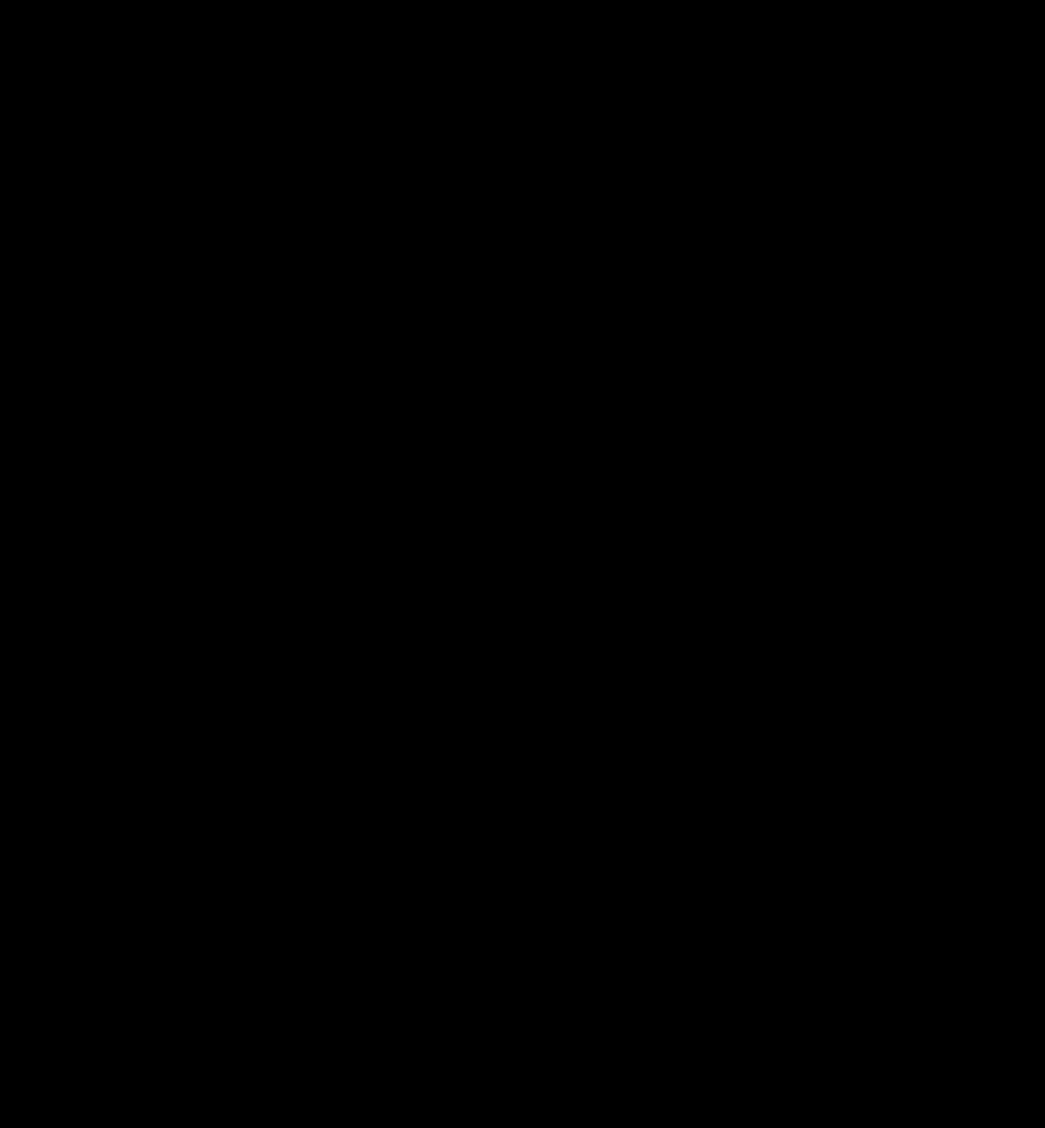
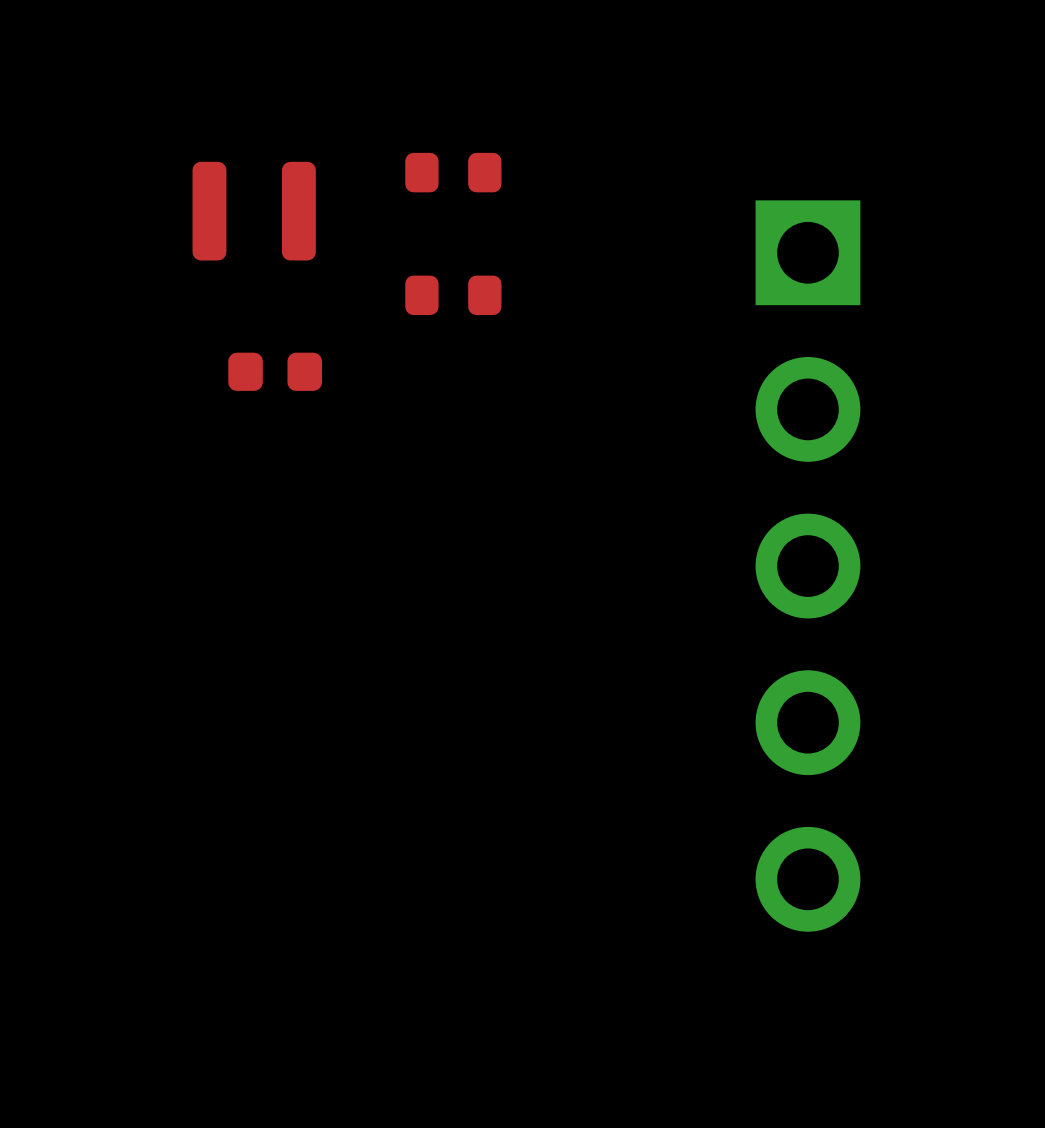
part: none -> (453, 172)
part: none -> (254, 211)
part: none -> (453, 295)
part: none -> (275, 371)
part: none -> (807, 566)

